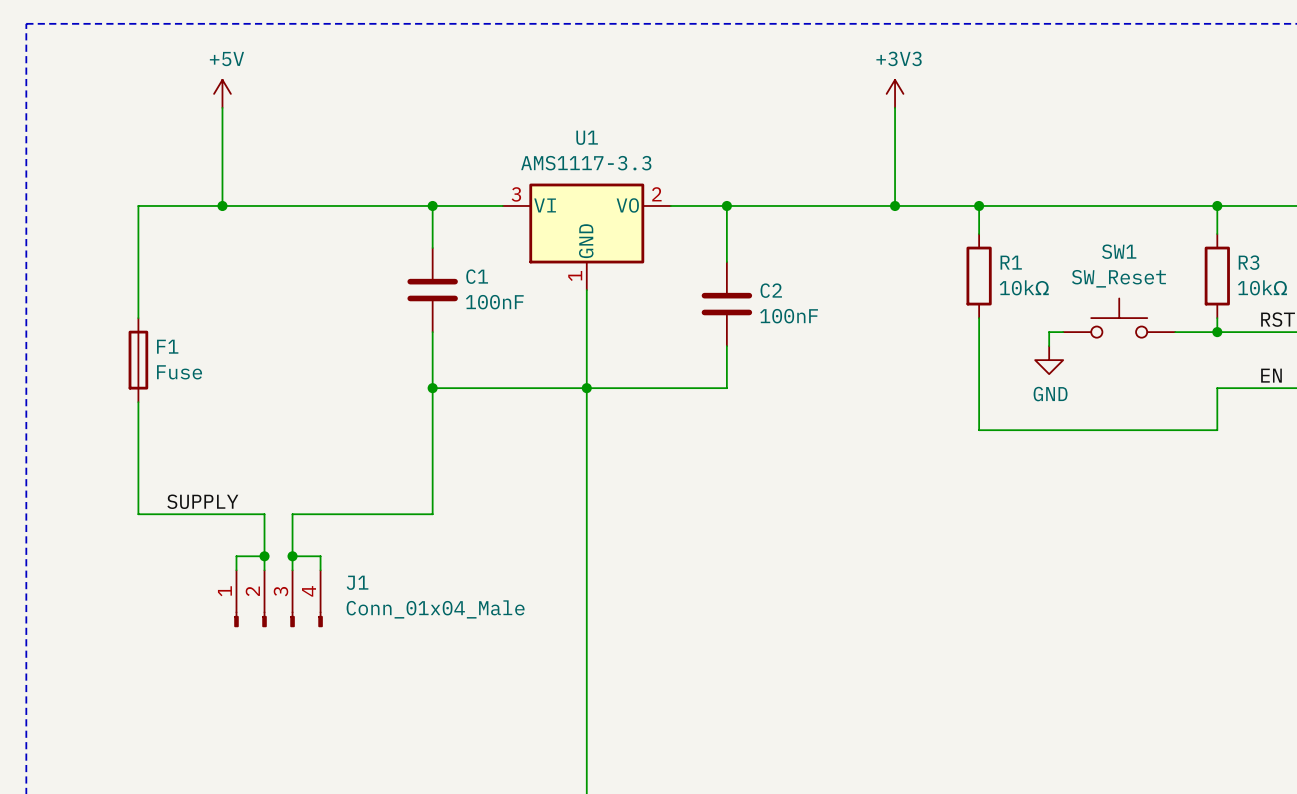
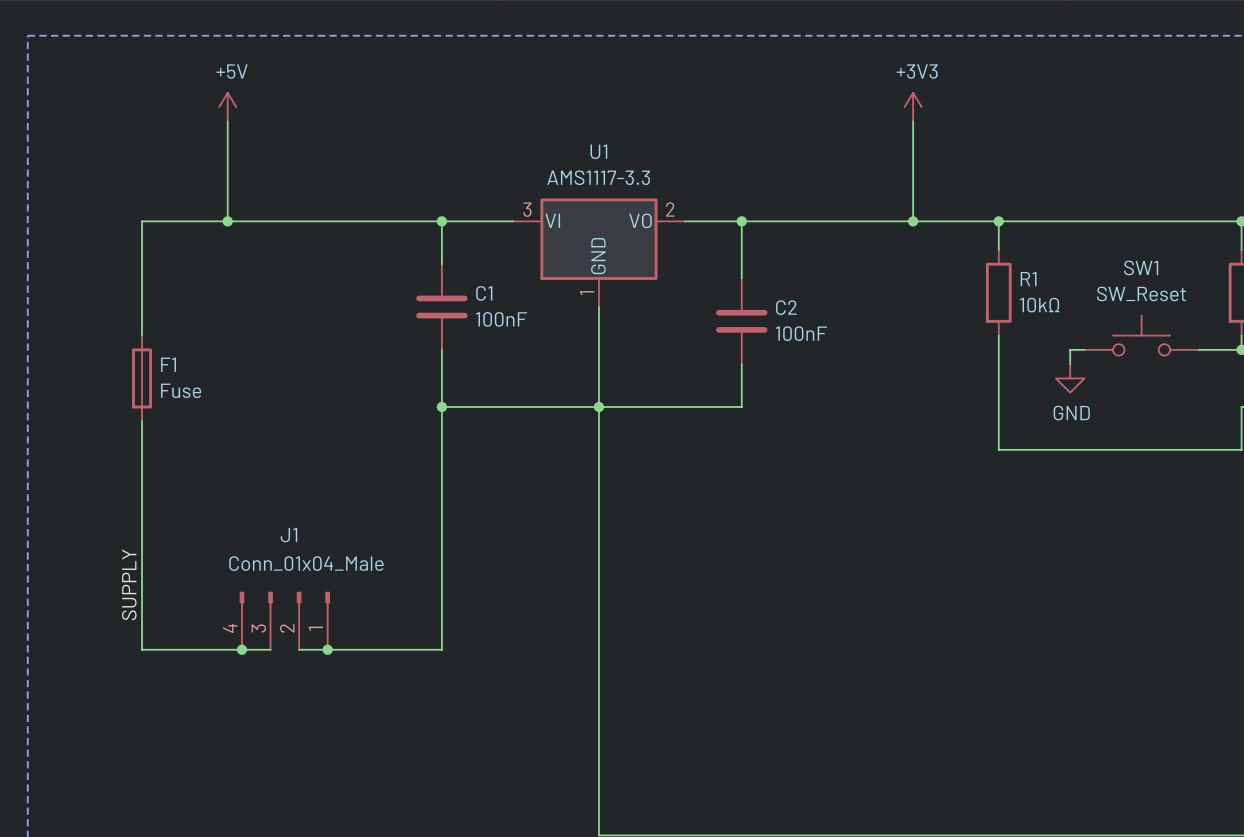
label rotation: 0° (202, 501) -> 90° counterclockwise (129, 584)
label position: SUPPLY (202, 501) -> SUPPLY (129, 584)
wire: (138, 514) (264, 514) (264, 570) -> (142, 535) (142, 649) (270, 649)
wire: (432, 514) (292, 514) (292, 570) -> (441, 535) (441, 649) (299, 649)
wire: (264, 556) (236, 556) (236, 570) -> none
junction: (264, 556) -> none
wire: (292, 556) (320, 556) (320, 570) -> none
junction: (292, 556) -> none
J1 name position: J1 (357, 582) -> J1 (288, 535)
J1 value position: Conn_01x04_Male (435, 609) -> Conn_01x04_Male (306, 563)
J1 rotation: 0° (278, 619) -> 180° (284, 599)
junction: none -> (241, 649)
junction: none -> (327, 649)

